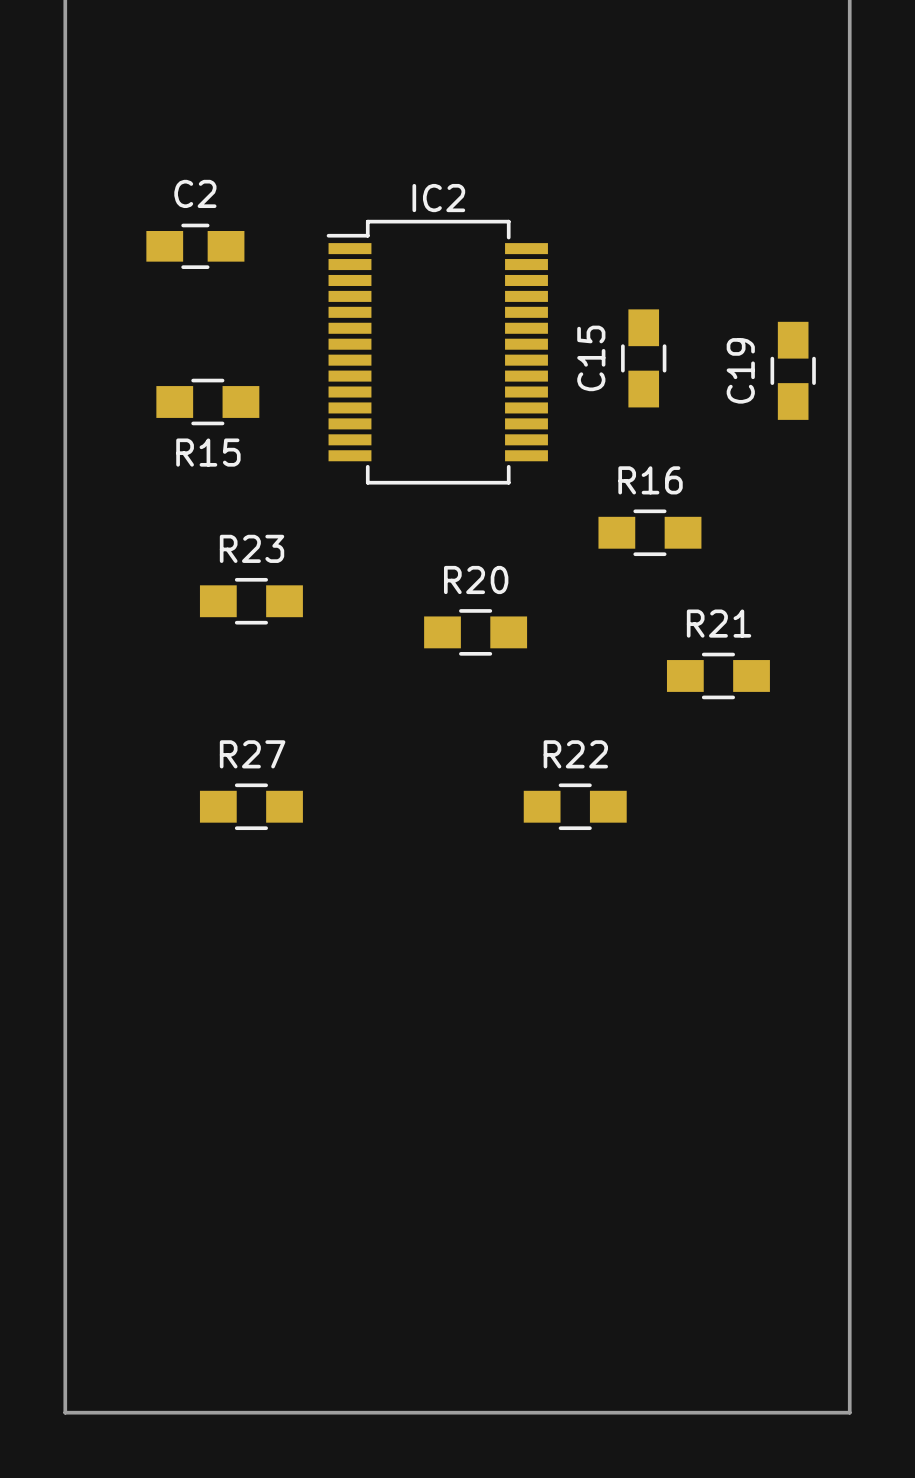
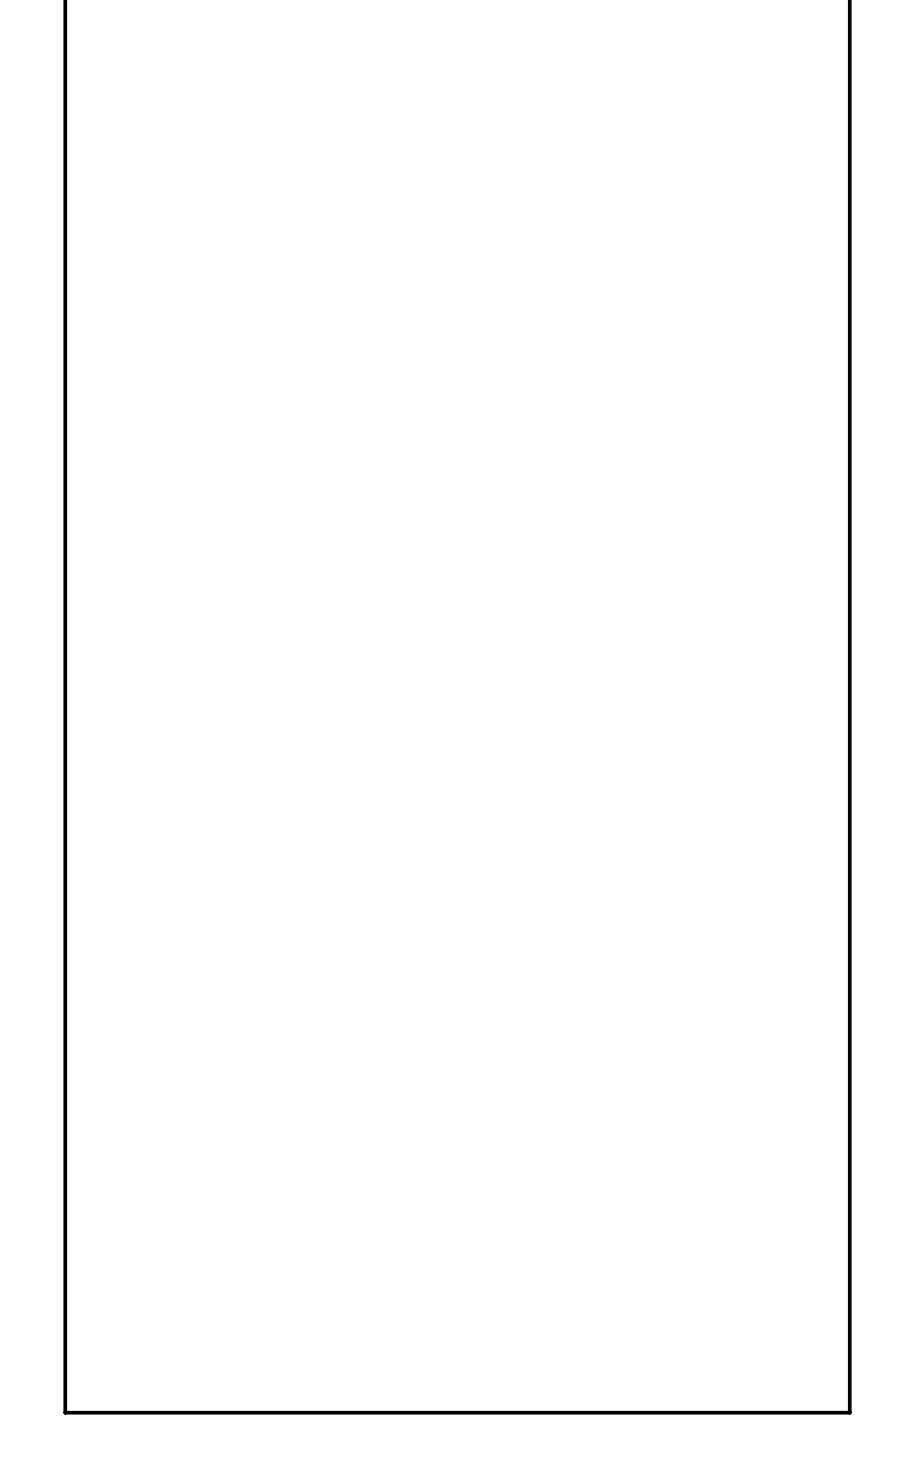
C2: (195, 246) -> none
IC2: (437, 352) -> none
C15: (643, 358) -> none
C19: (793, 370) -> none
R15: (207, 401) -> none
R16: (649, 532) -> none
R23: (251, 601) -> none
R20: (475, 632) -> none
R21: (718, 675) -> none
R27: (251, 806) -> none
R22: (575, 806) -> none

